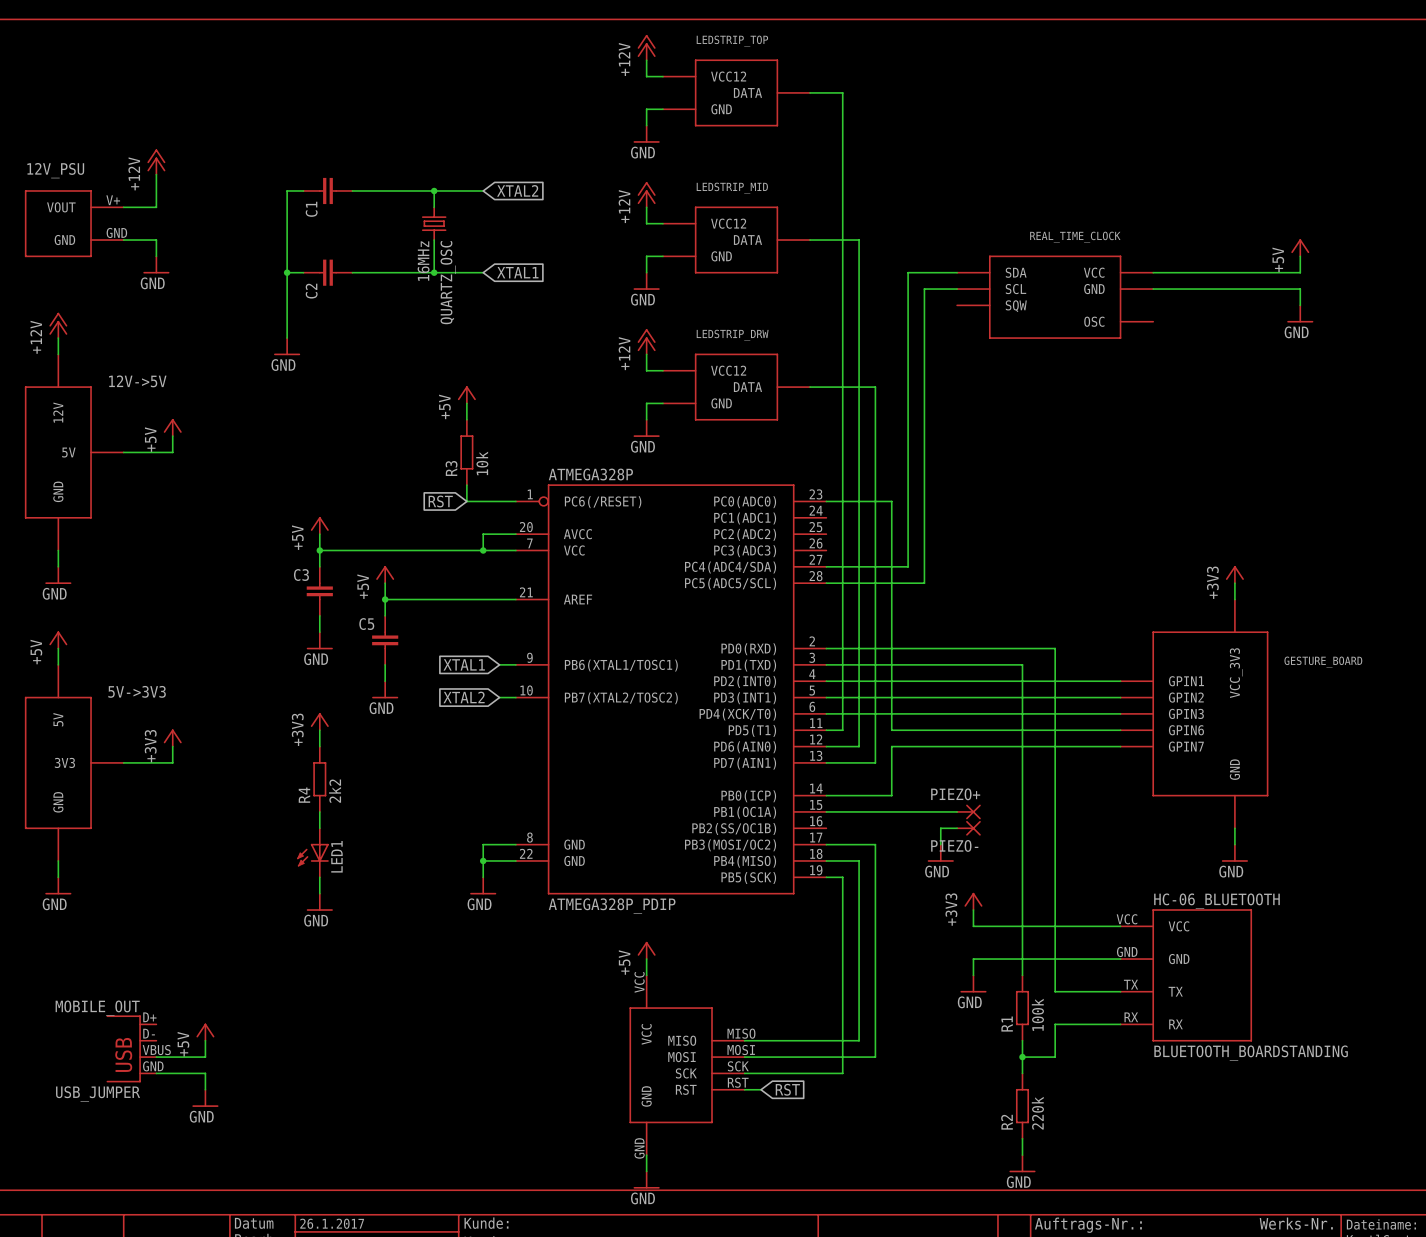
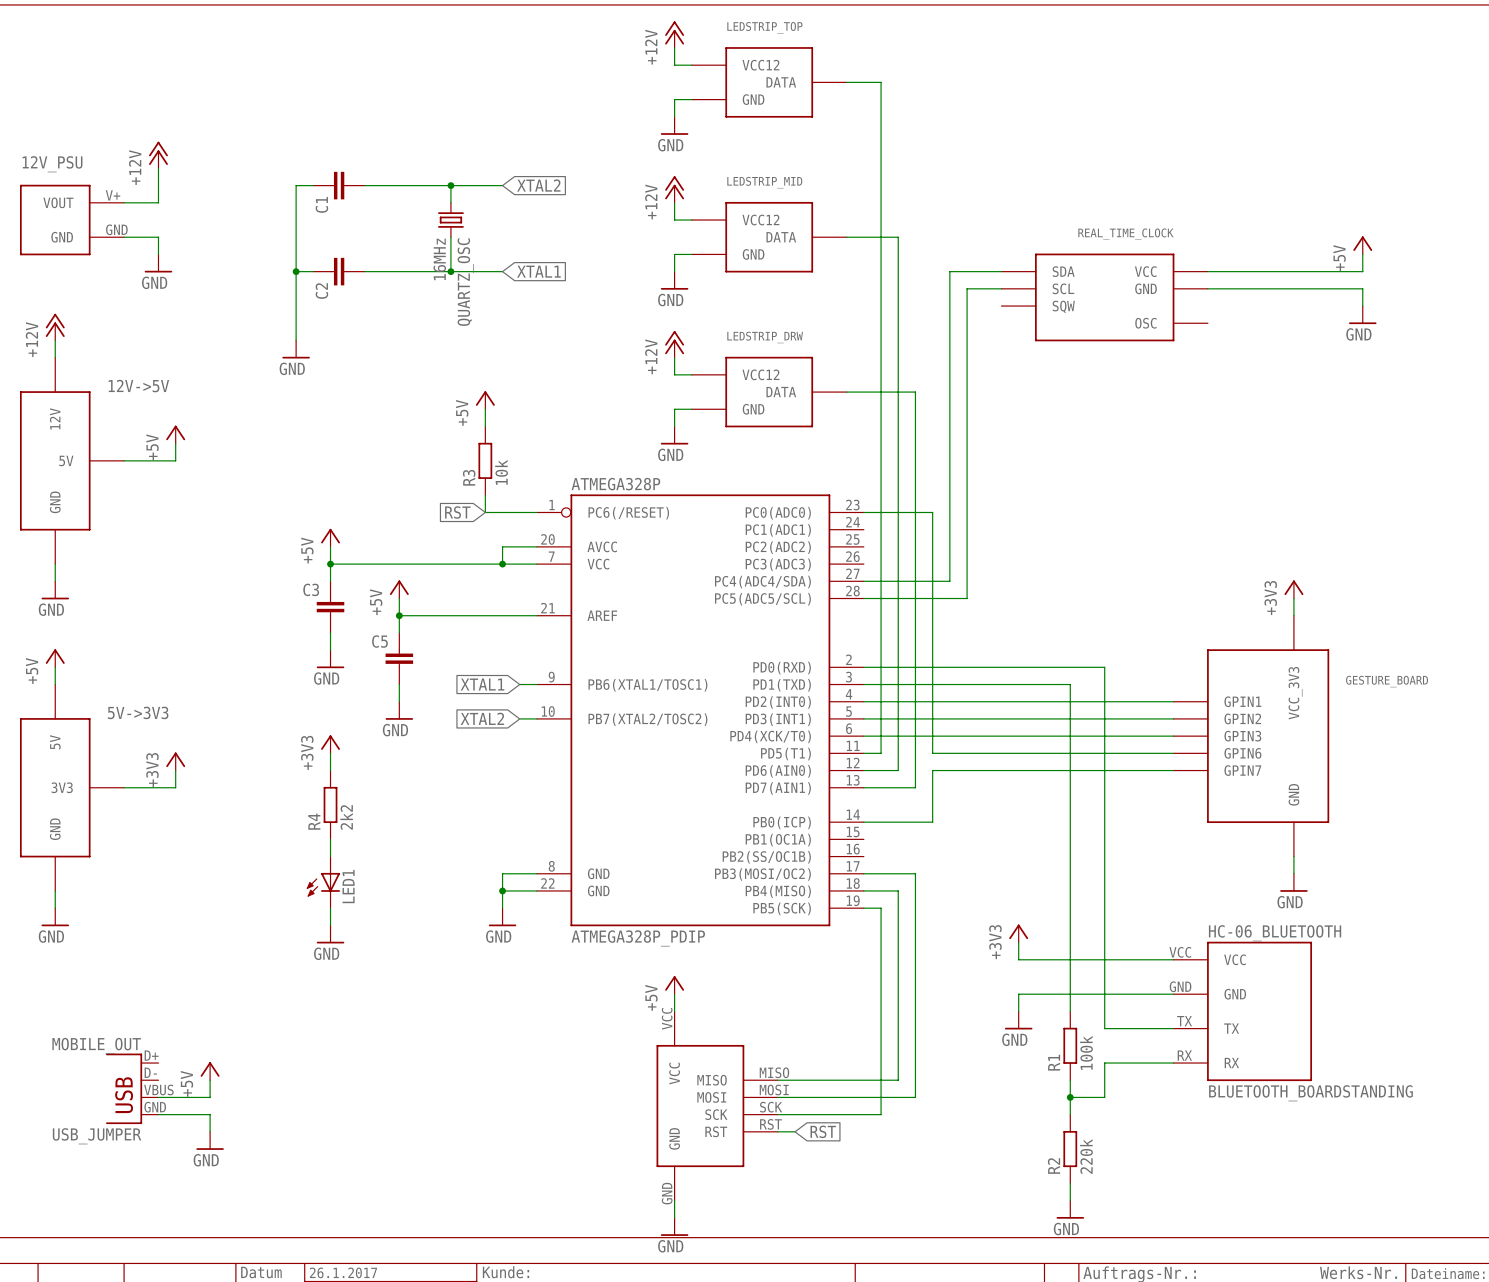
wire: (826, 811) (957, 811) -> none
PIEZO+: (968, 811) -> none
wire: (957, 828) (940, 828) (940, 844) -> none
PIEZO-: (968, 828) -> none
power symbol: GND (940, 853) -> none

